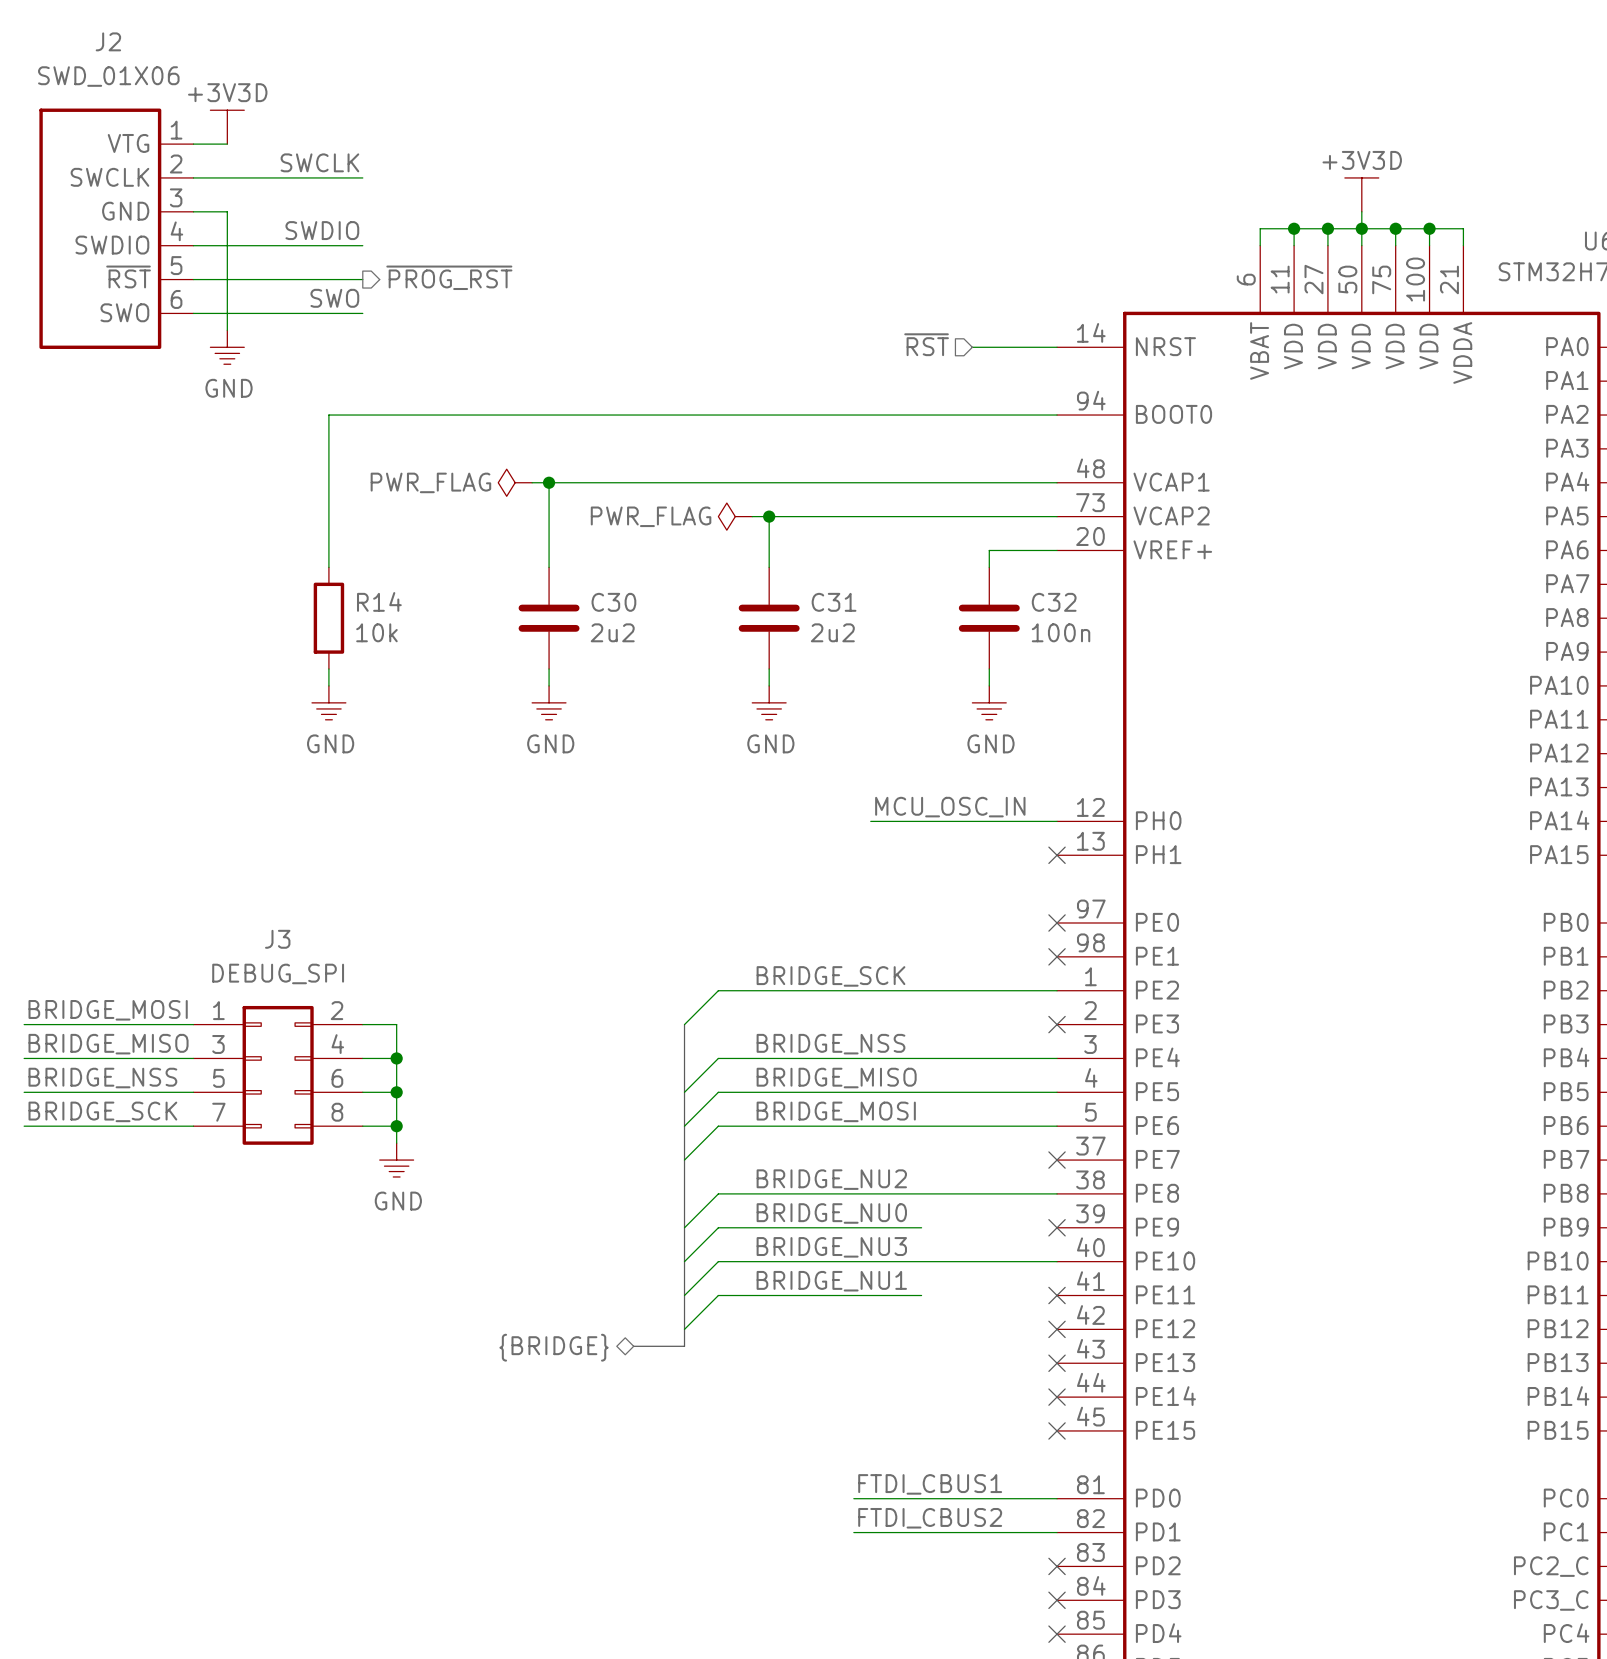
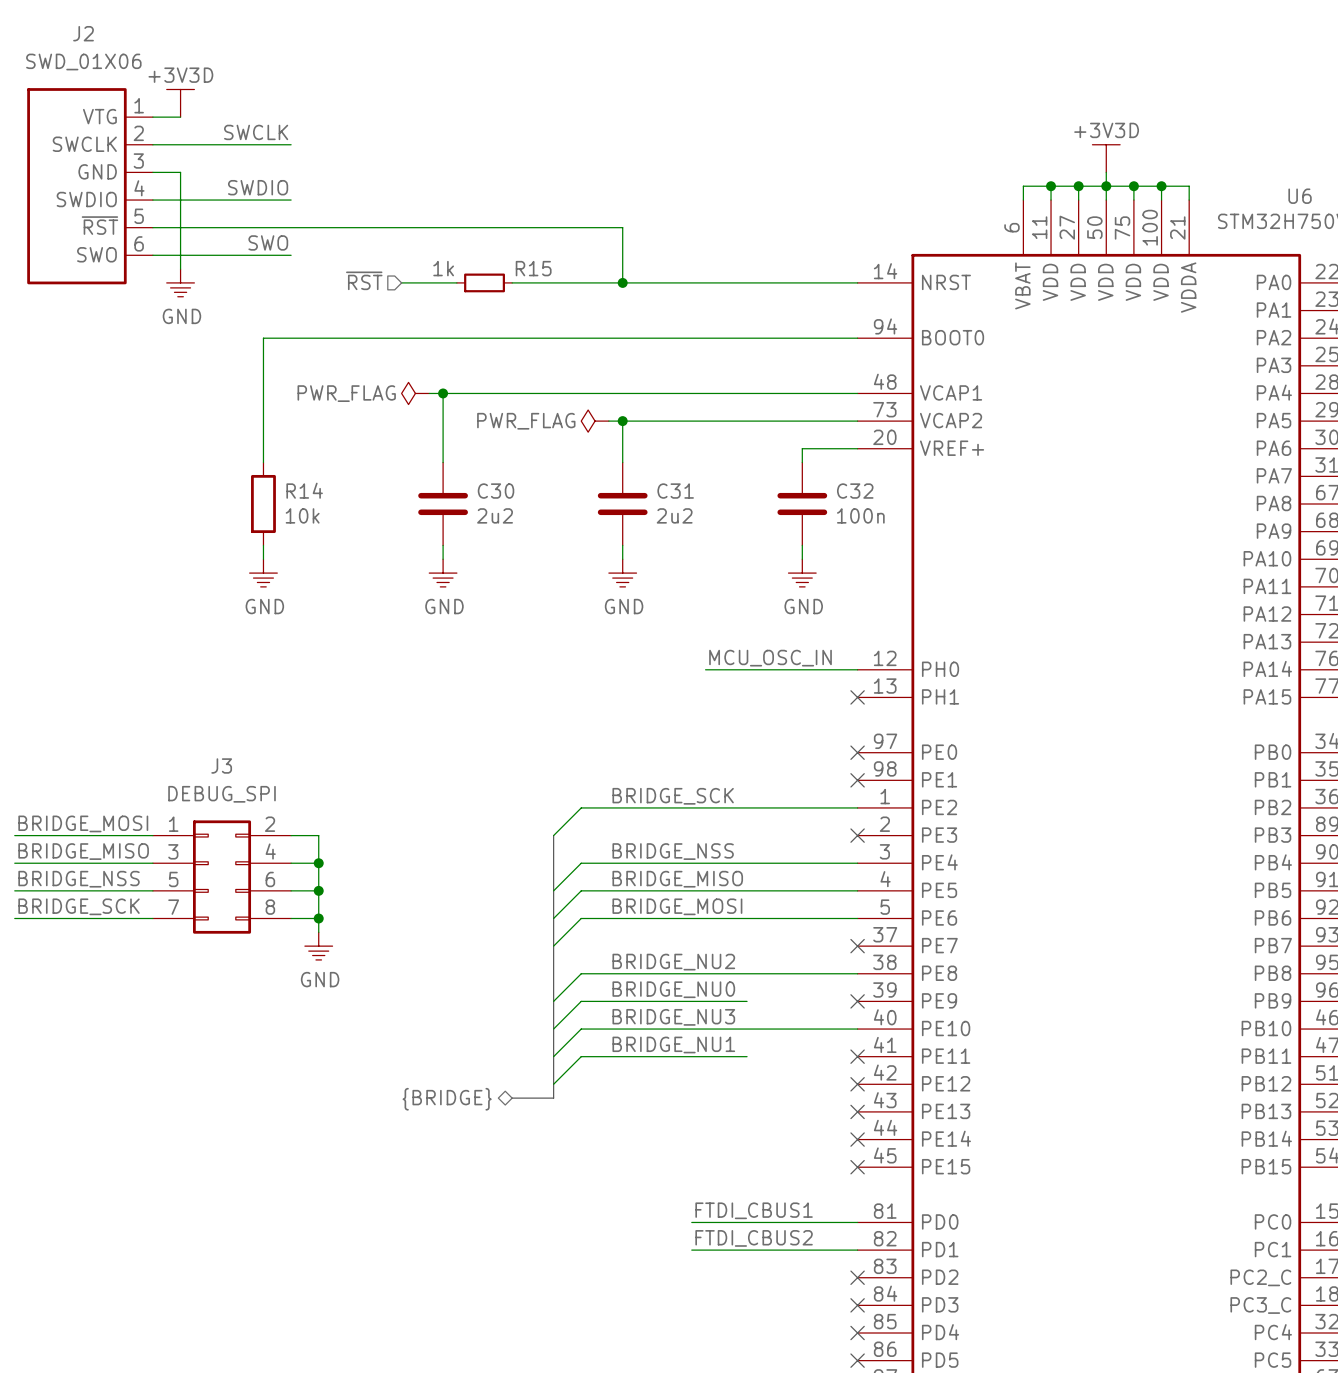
hierarchical label: ~{PROG_RST} (449, 277) -> none
wire: none -> (291, 227) (622, 227) (622, 282)
hierarchical label: none -> ~{RST} (364, 280)
hierarchical label: ~{RST} (926, 344) -> none
wire: none -> (401, 282) (456, 282)
R15: none -> 1k (484, 282)
wire: none -> (512, 282) (788, 282)
junction: none -> (622, 282)

